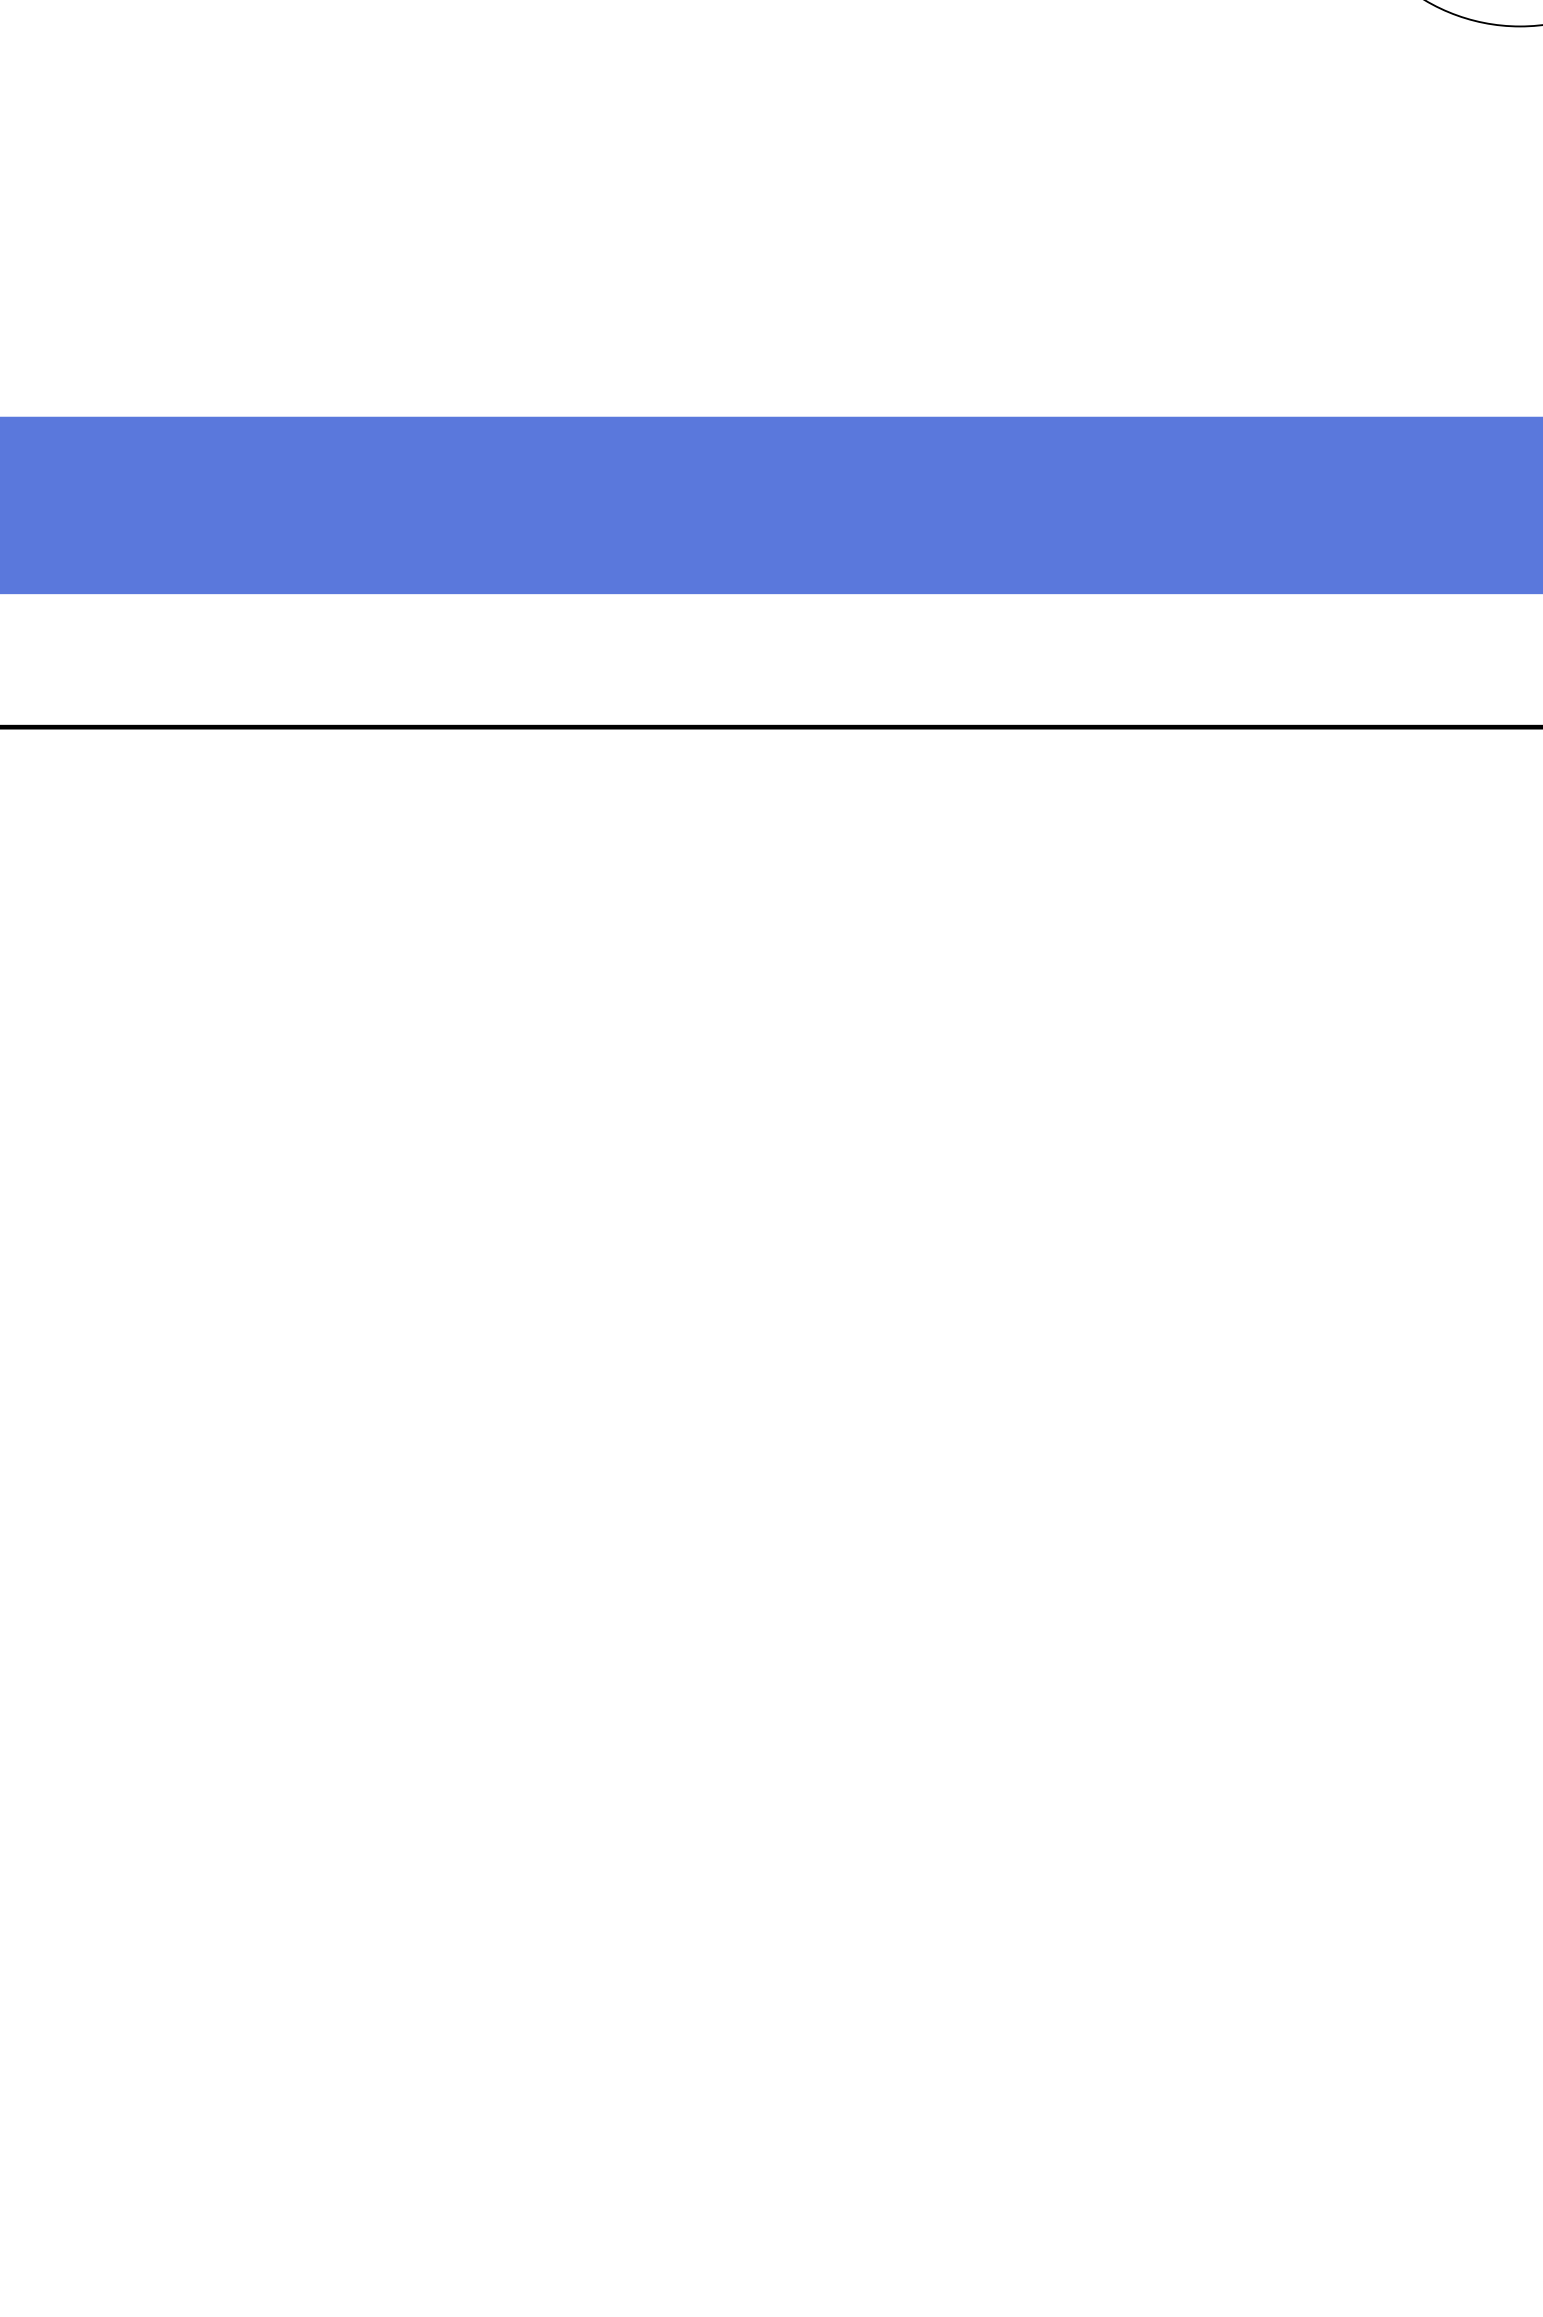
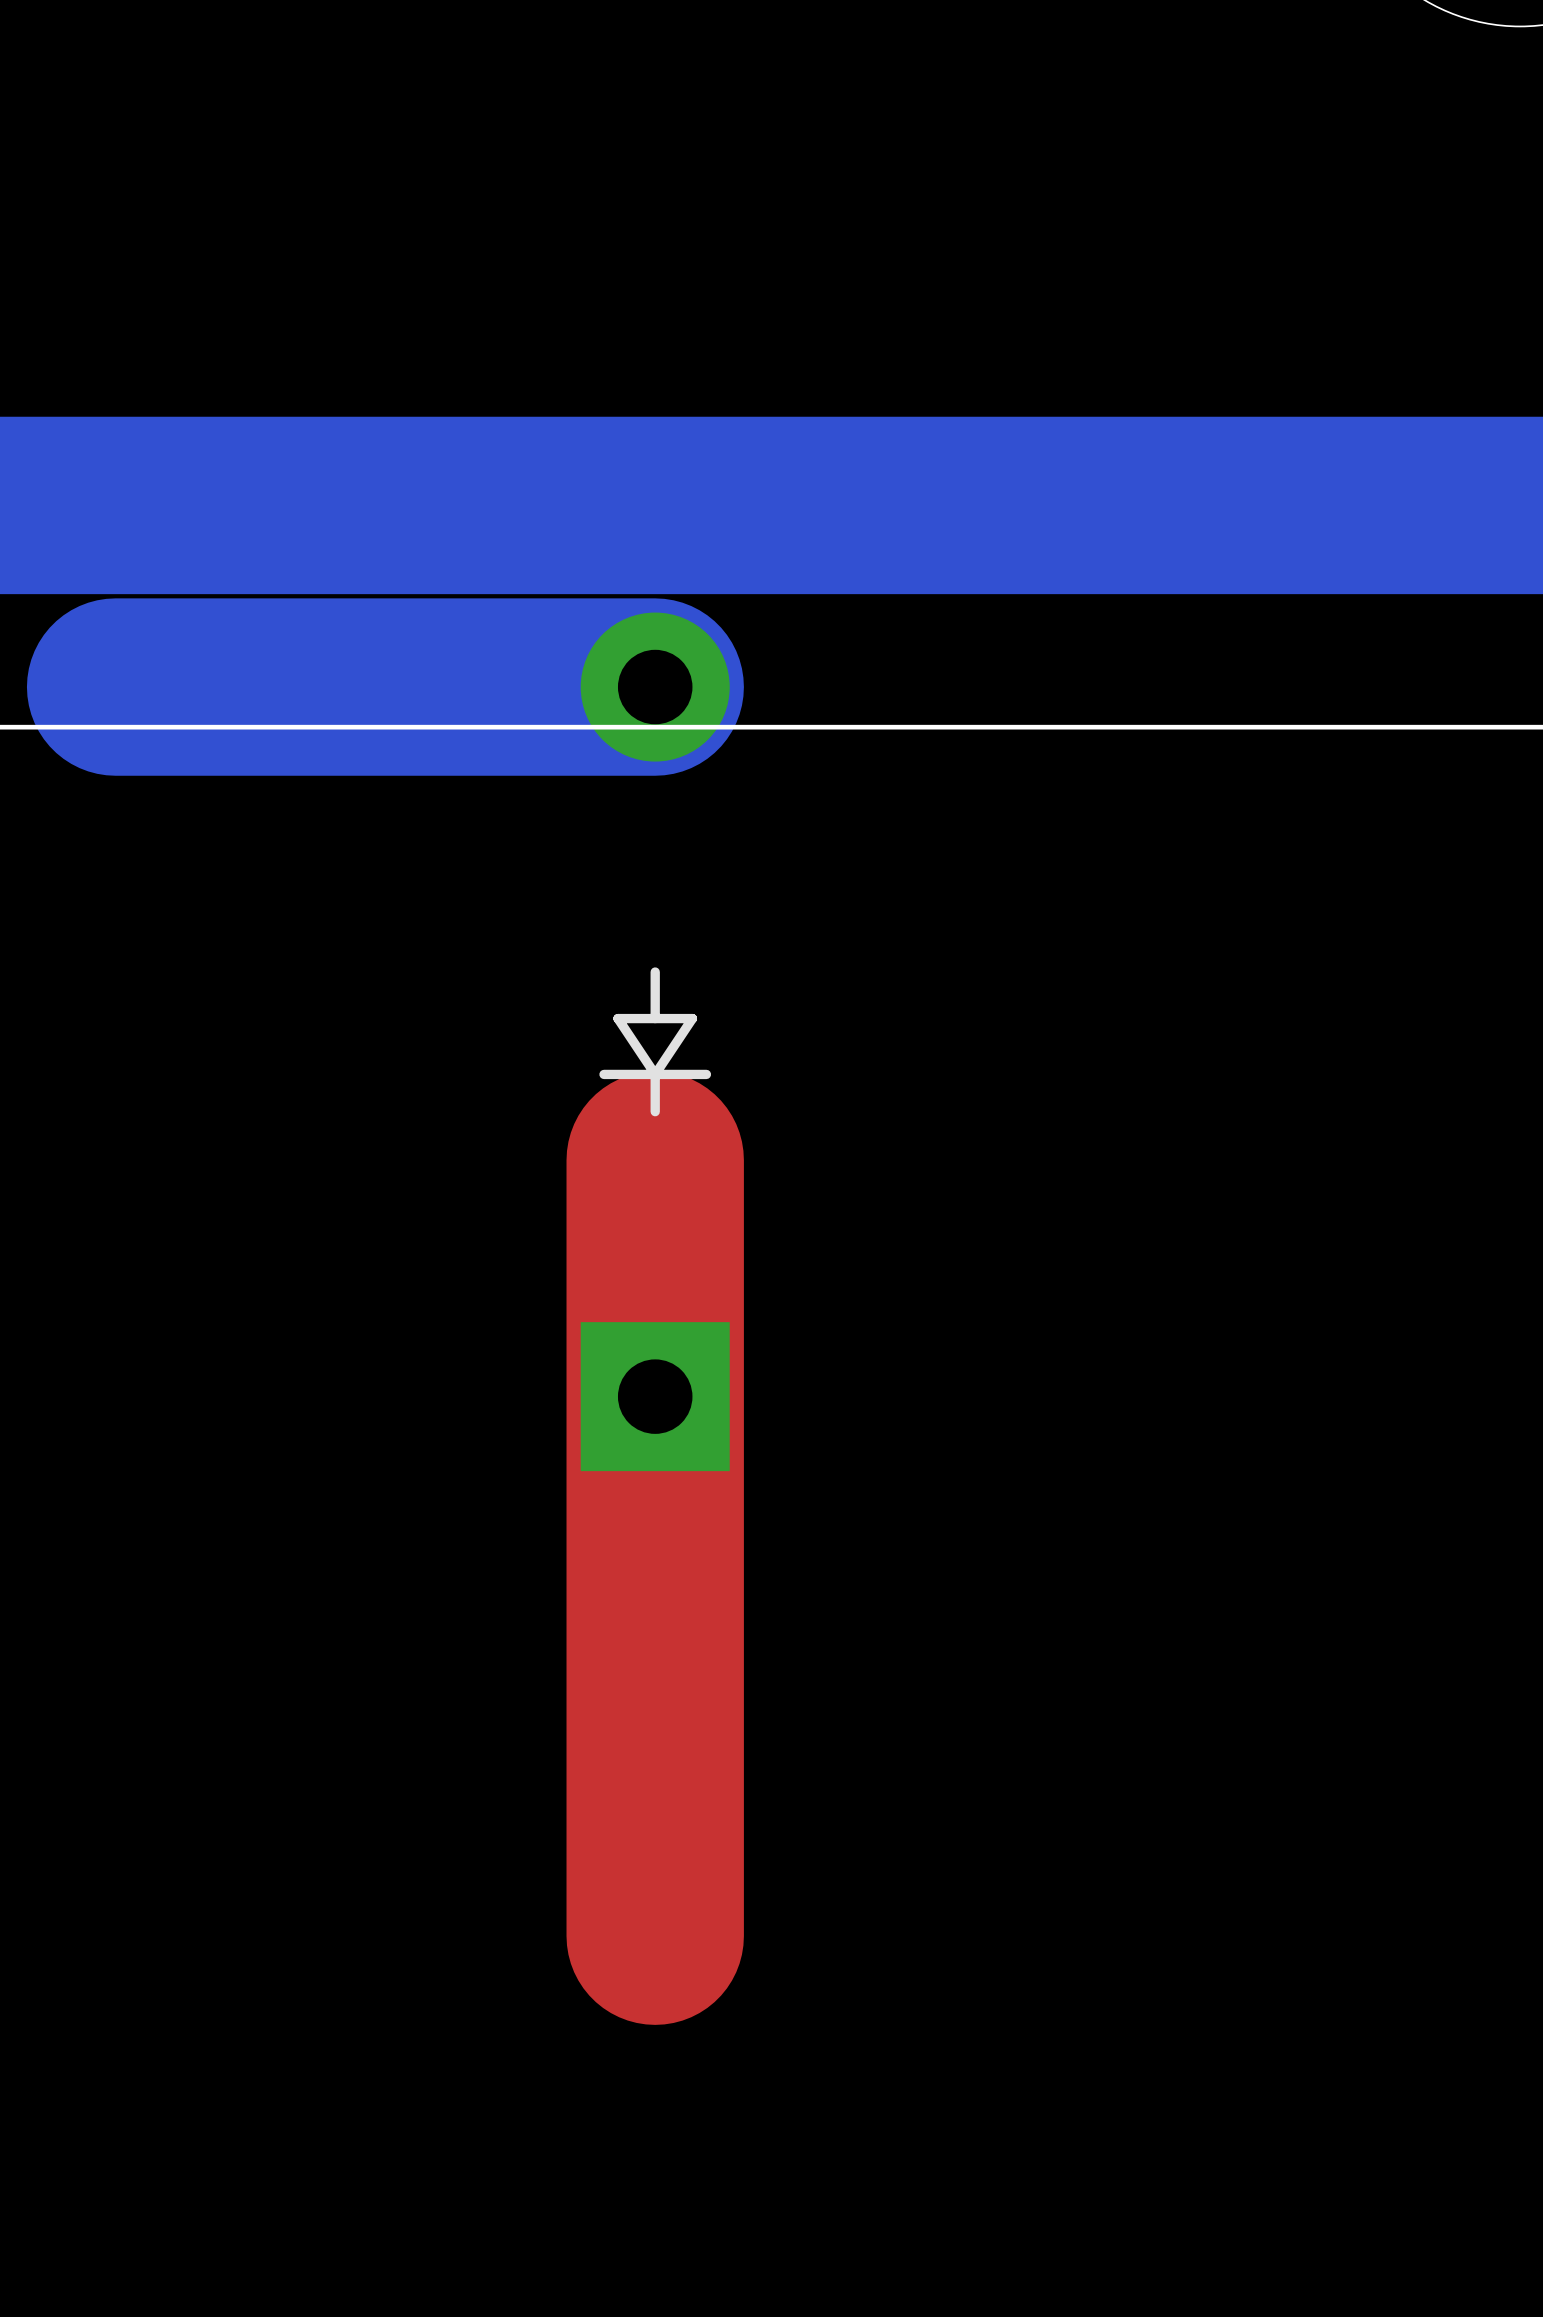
bottom track: none -> (115, 687) (655, 687)
part: none -> (655, 1041)
top track: none -> (655, 1160) (655, 1936)

